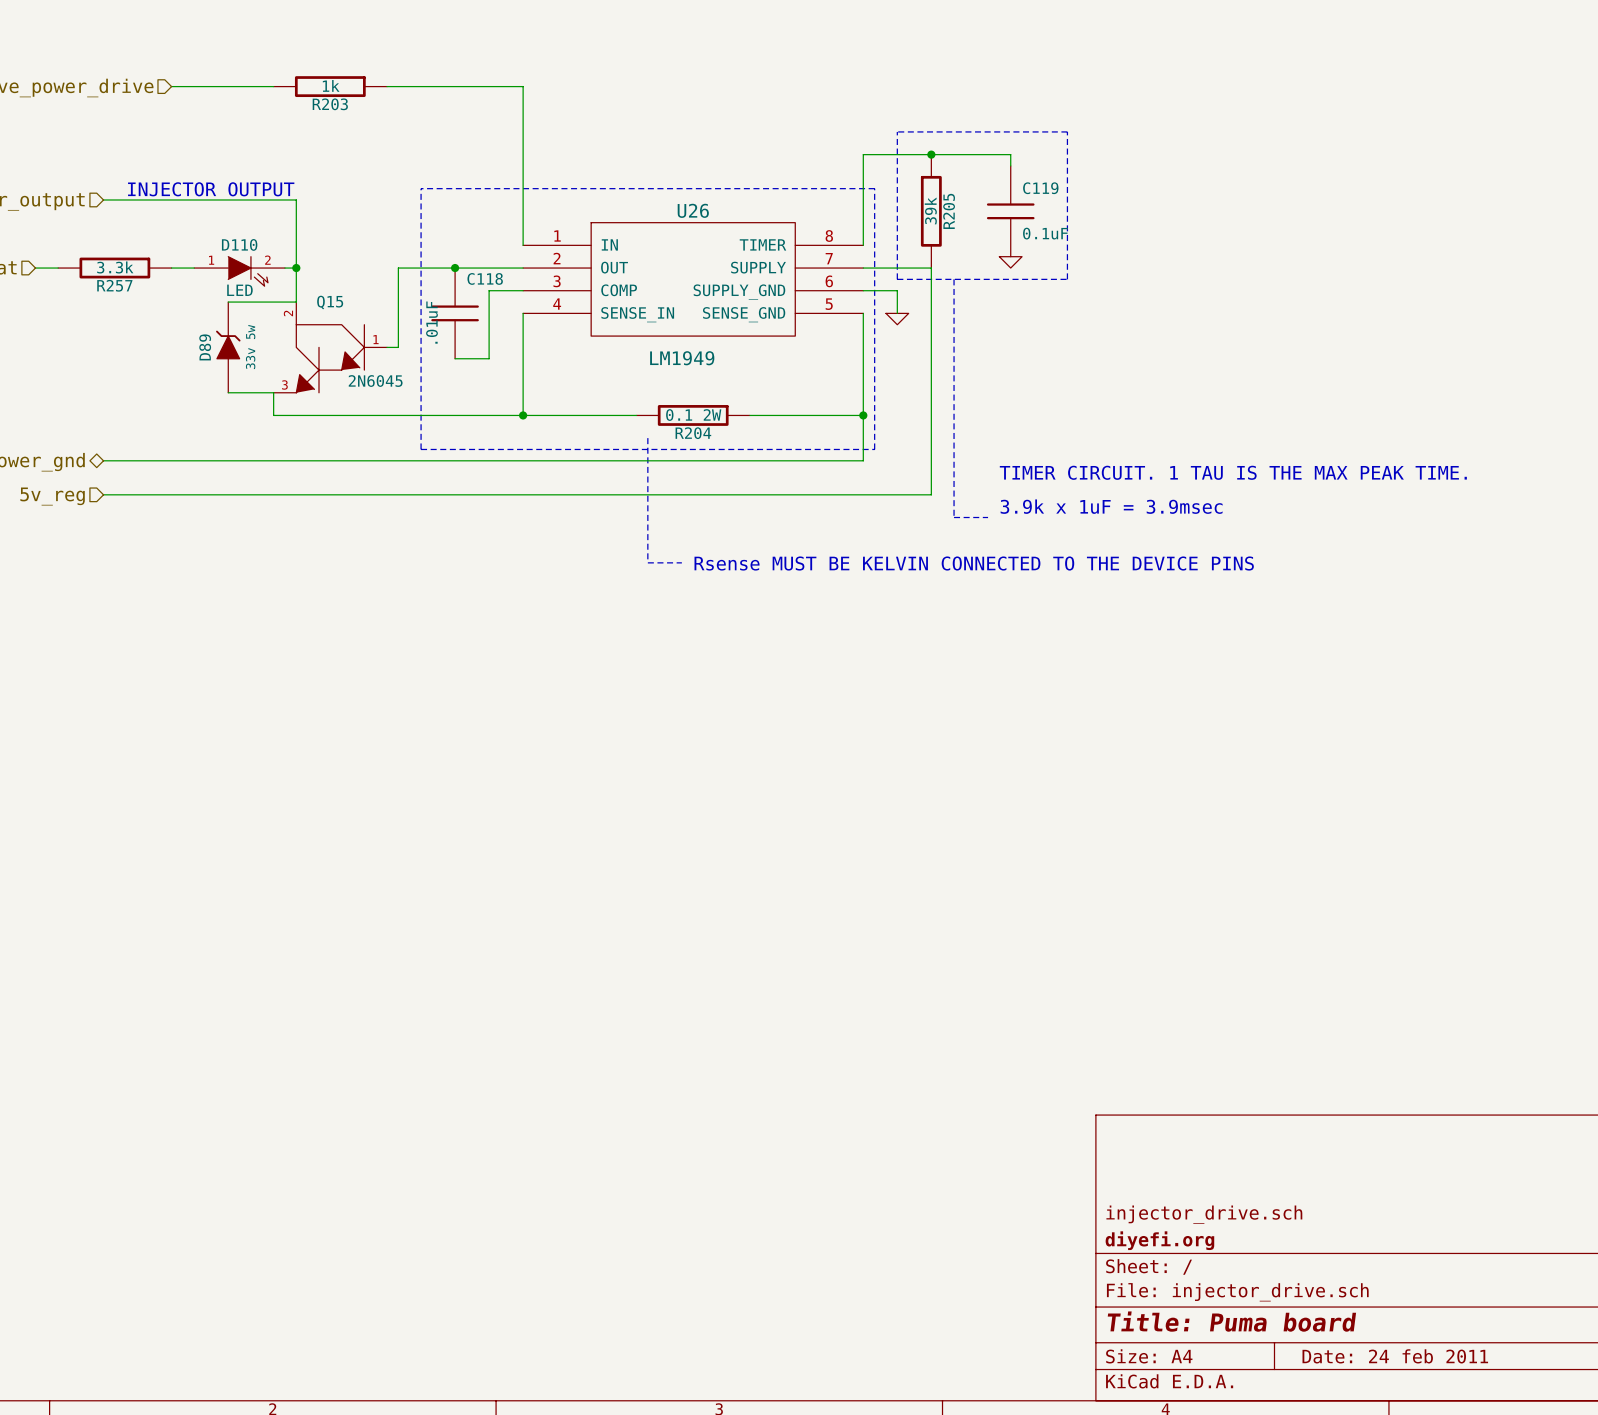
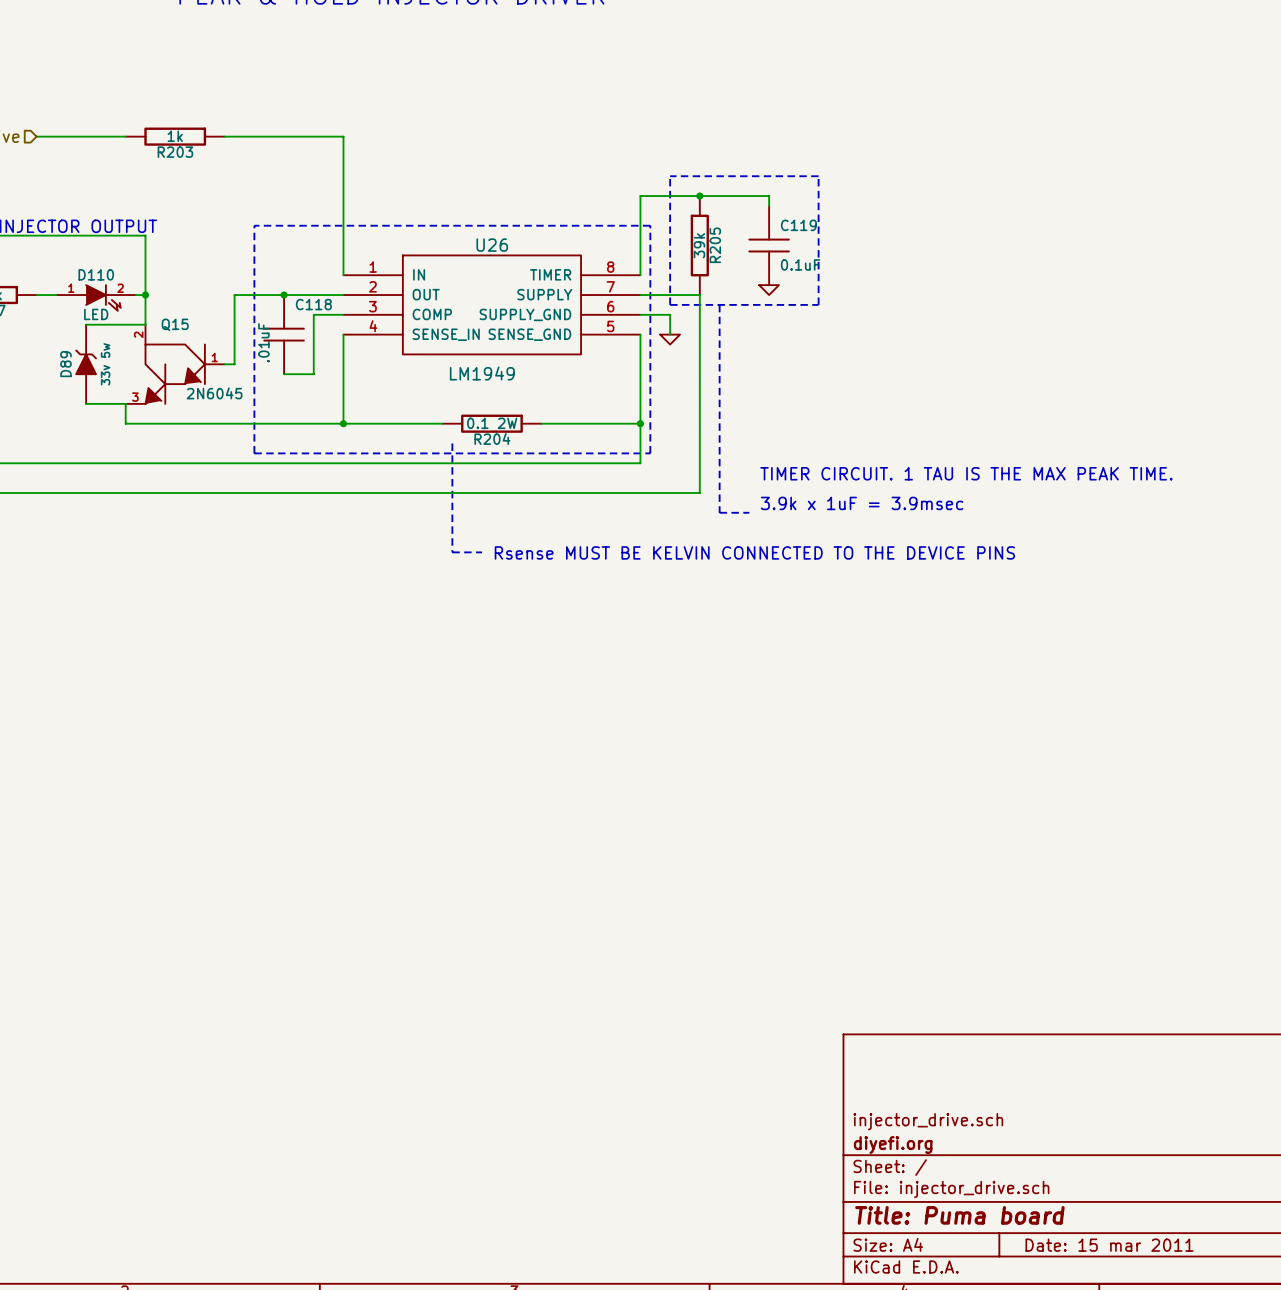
title block: Date: 24 feb 2011 (1395, 1356) -> Date: 15 mar 2011 (1109, 1245)

